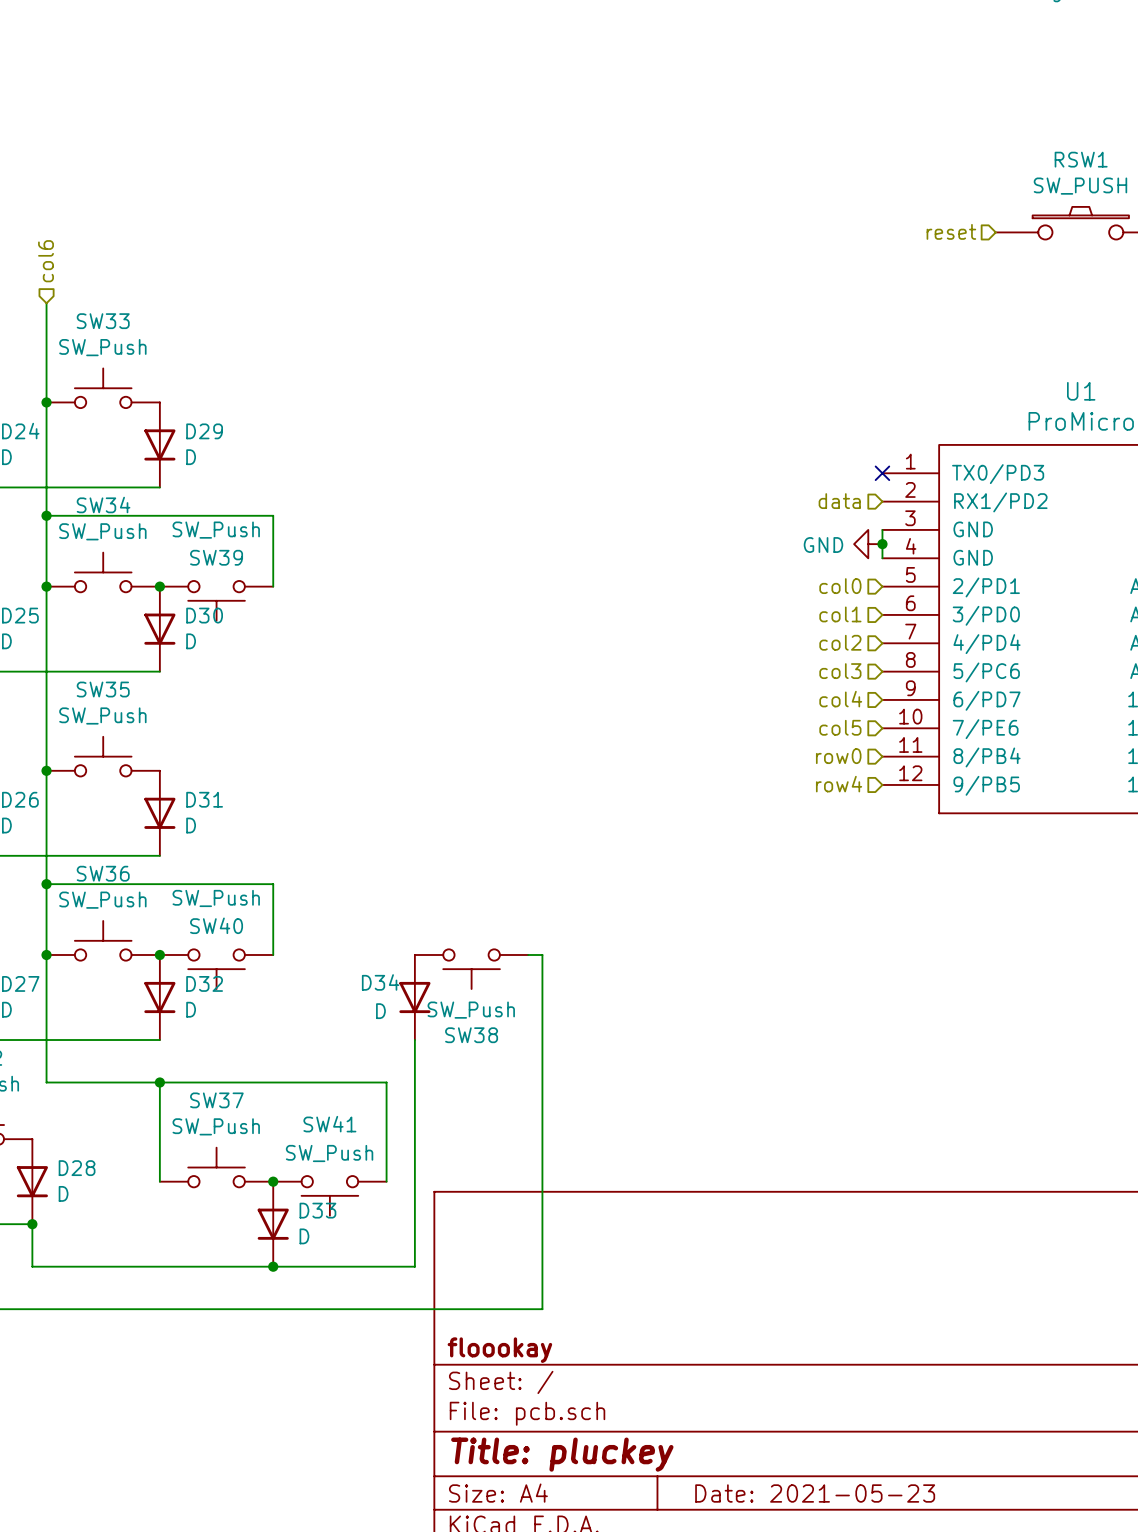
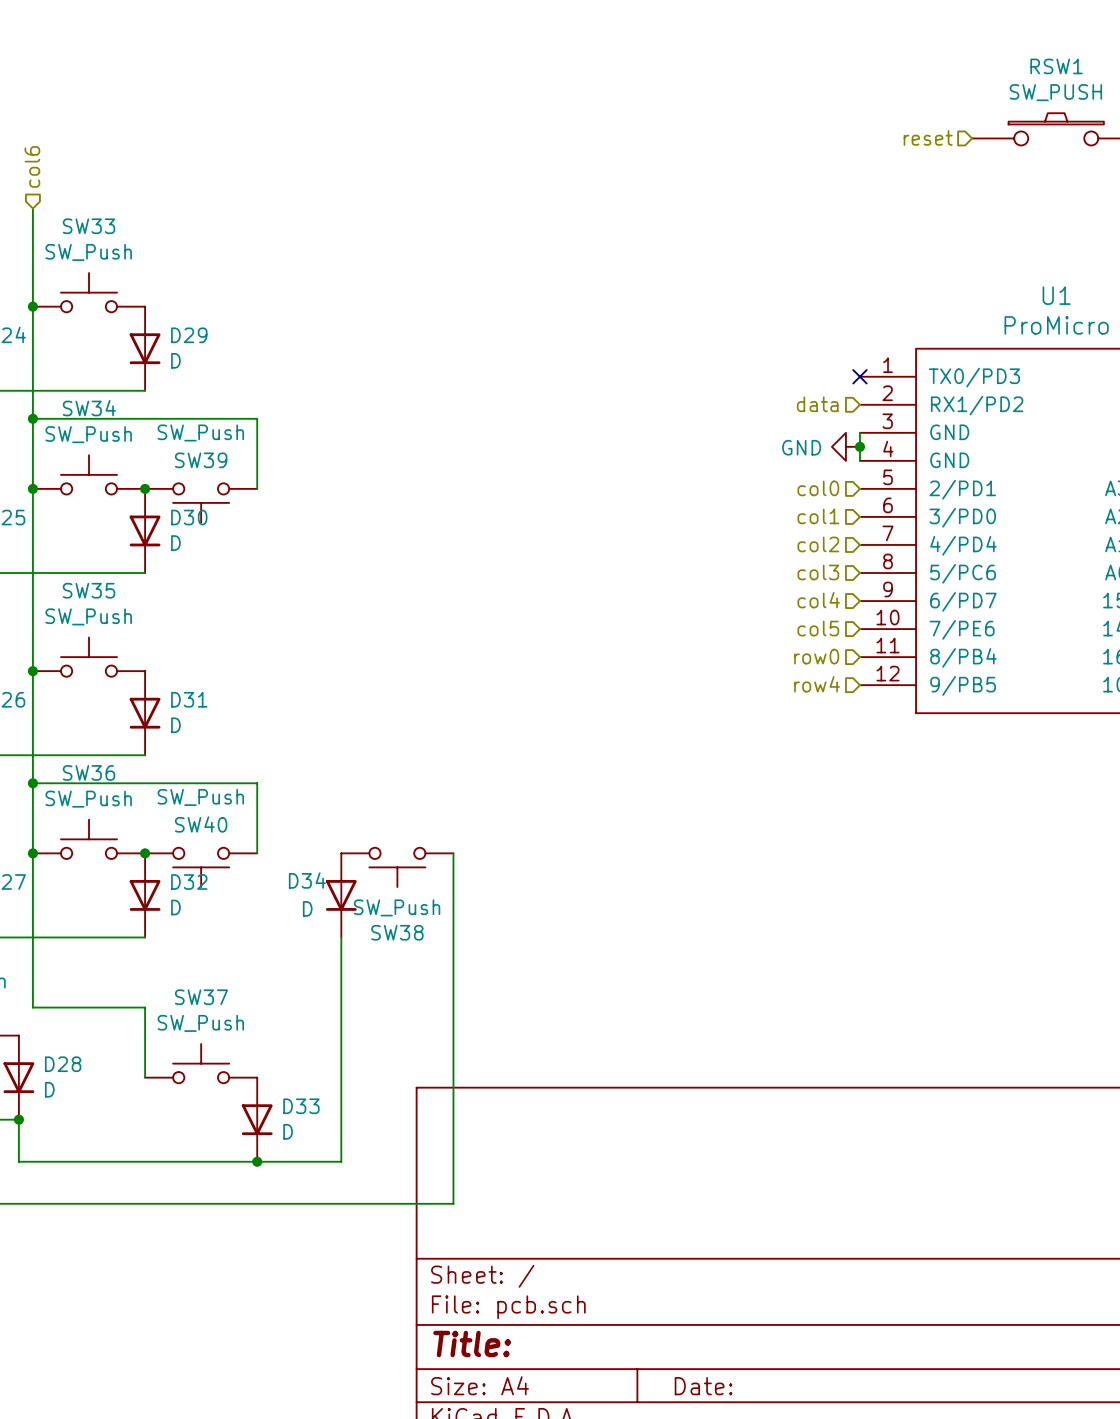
wire: (528, 954) (542, 954) (542, 1309) (471, 1309) -> (453, 853) (453, 1203)
SW38 position: (471, 969) -> (397, 867)
D34 position: (414, 997) -> (341, 895)
wire: (414, 1040) (414, 1266) (358, 1266) -> (341, 937) (341, 1161)
wire: (46, 1082) (386, 1082) (386, 1181) -> none
wire: (159, 1082) (159, 1110) -> (32, 979) (32, 1007) (145, 1007)
junction: (159, 1082) -> none
junction: (273, 1181) -> none
SW41: SW_Push (329, 1195) -> none
title block: floookay (499, 1350) -> none
title block: Title: pluckey (562, 1454) -> Title: (472, 1344)
title block: Date: 2021-05-23 (815, 1493) -> Date: (703, 1386)

